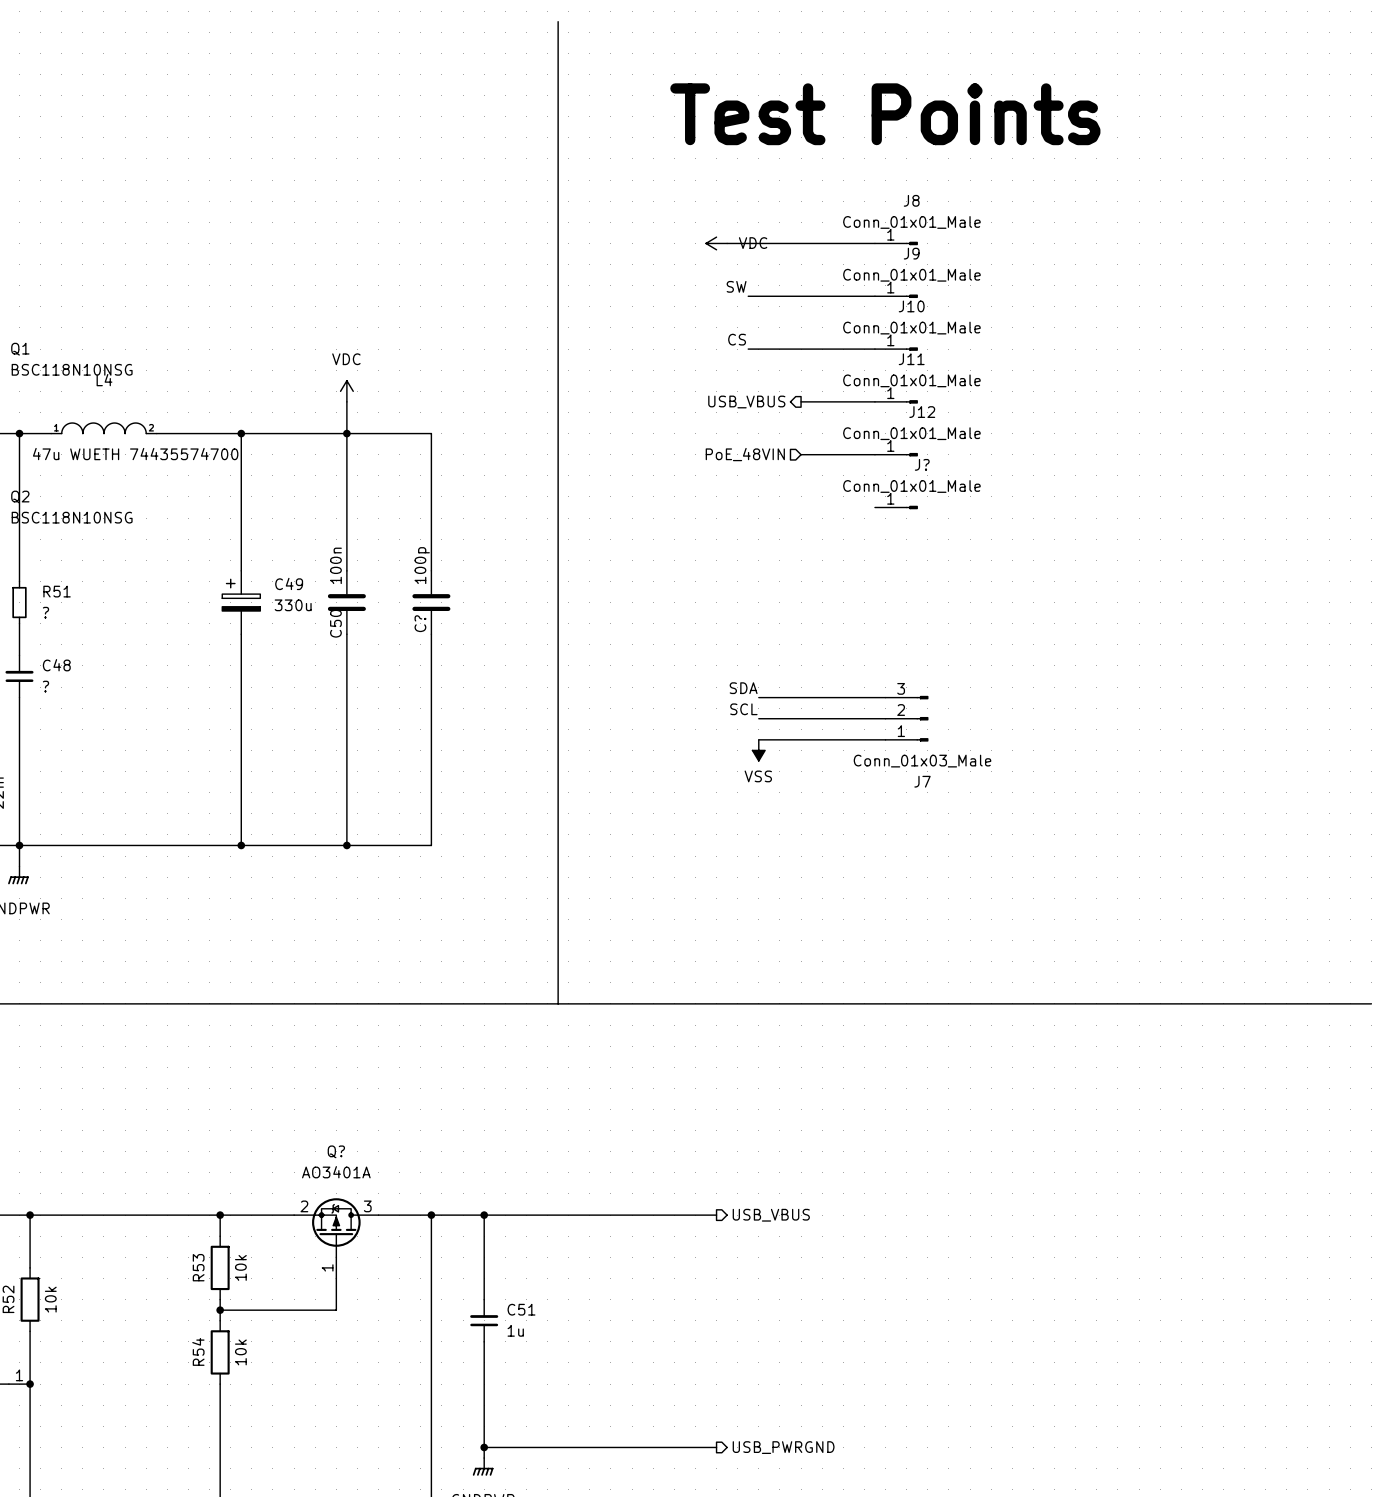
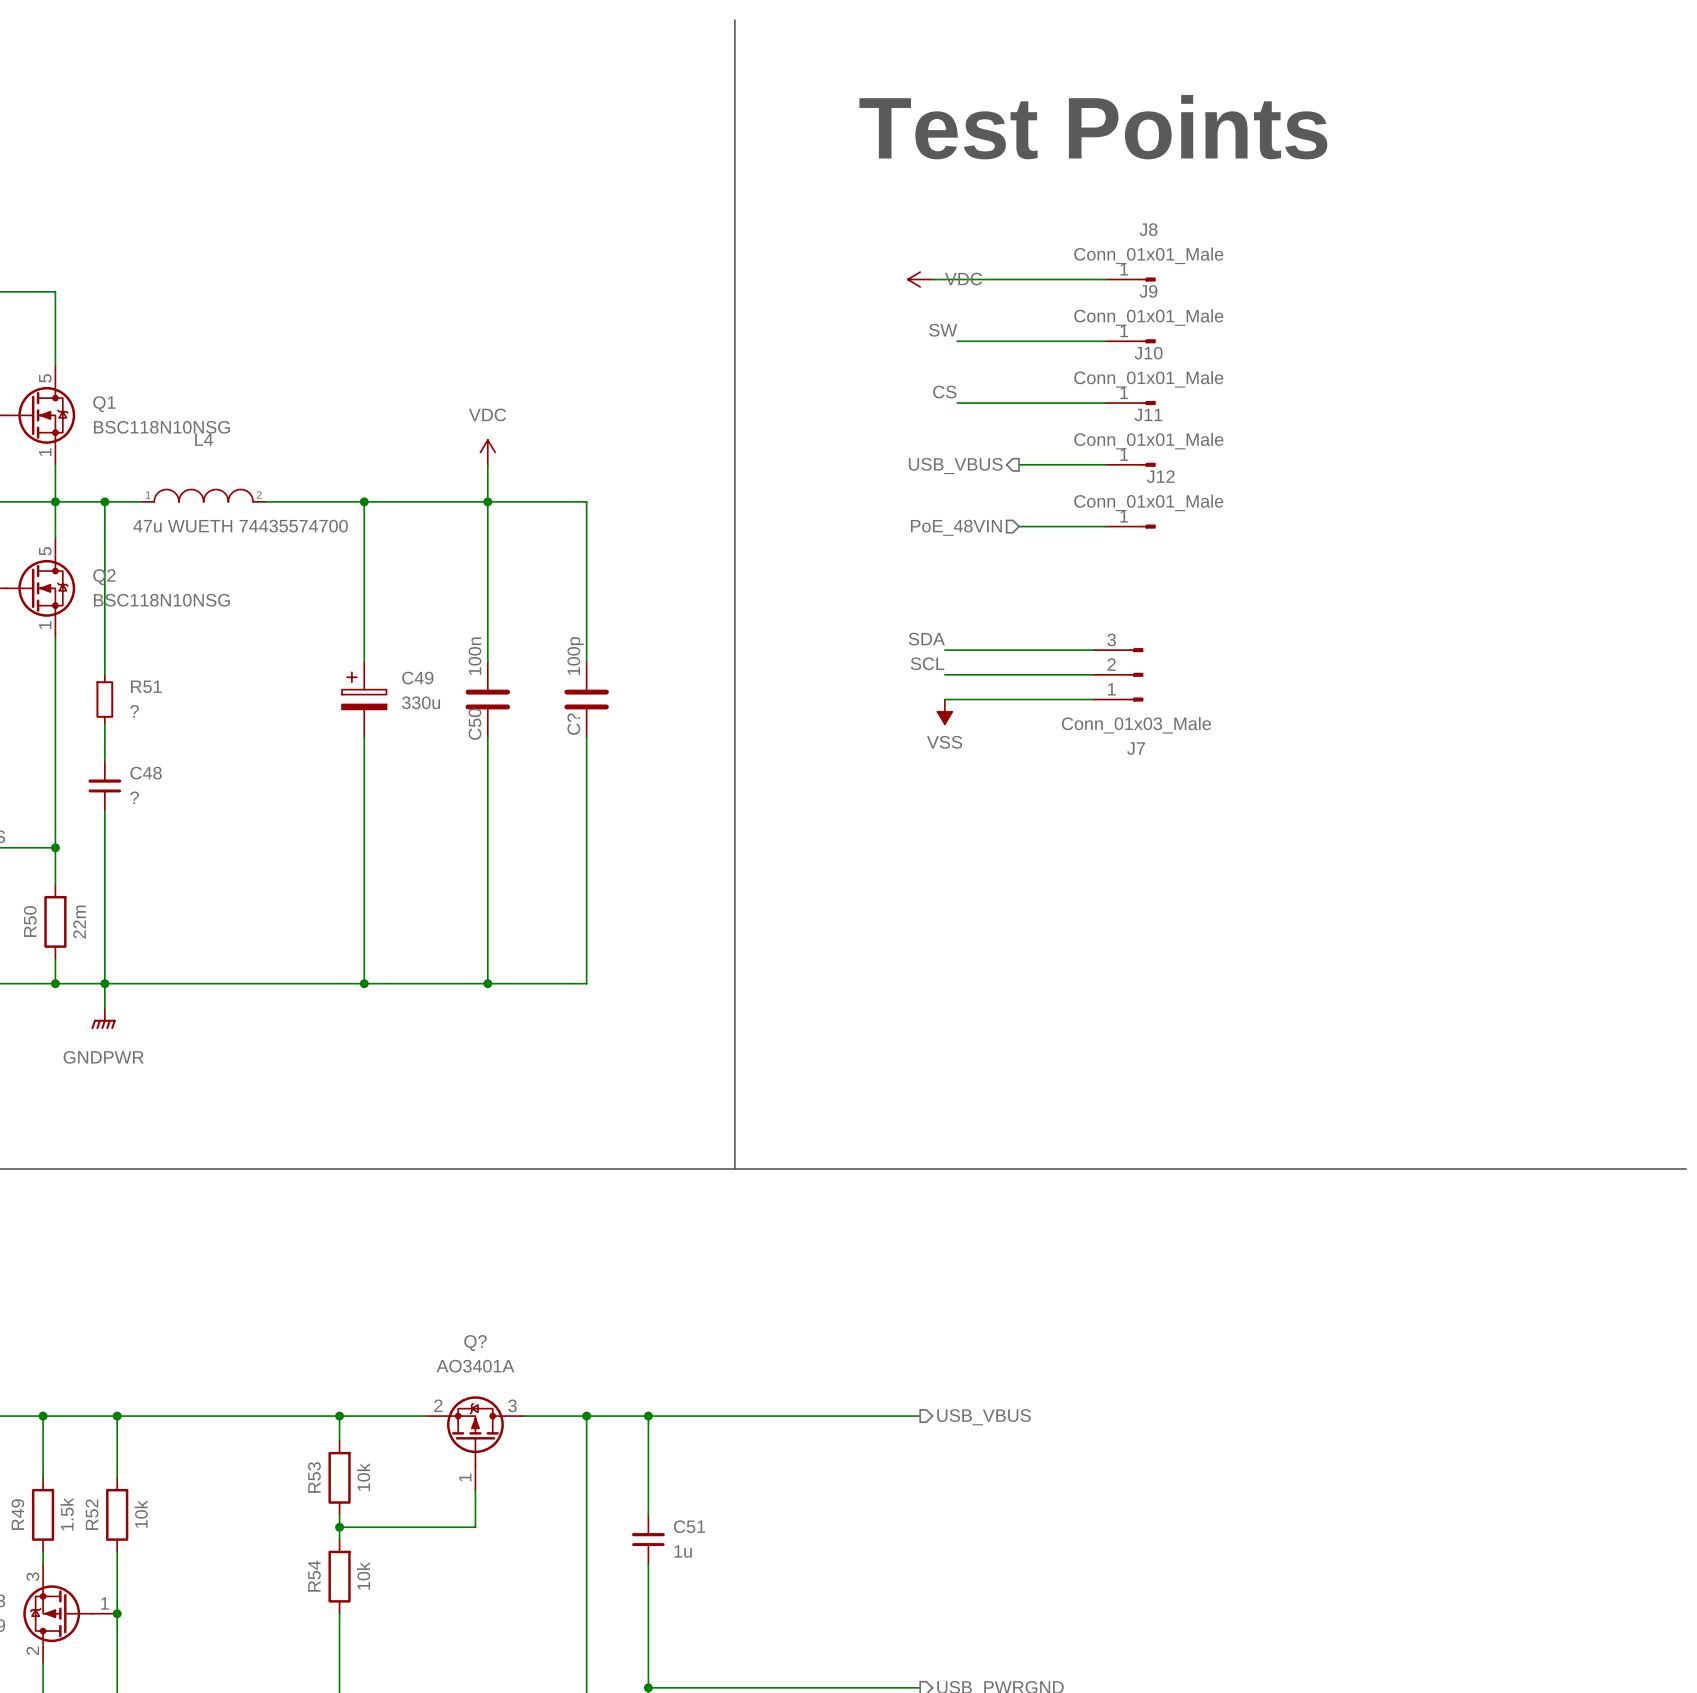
J?: Conn_01x01_Male (896, 507) -> none
label position: SDA (743, 688) -> SDA (926, 639)
wire: (758, 697) (885, 697) -> (944, 650) (1093, 650)
label position: SCL (743, 709) -> SCL (927, 663)
wire: (758, 718) (885, 718) -> (944, 674) (1093, 674)
J7 position: (906, 718) -> (1118, 674)
wire: (758, 739) (885, 739) -> (944, 699) (1093, 699)
power symbol position: VSS (758, 750) -> VSS (944, 711)

